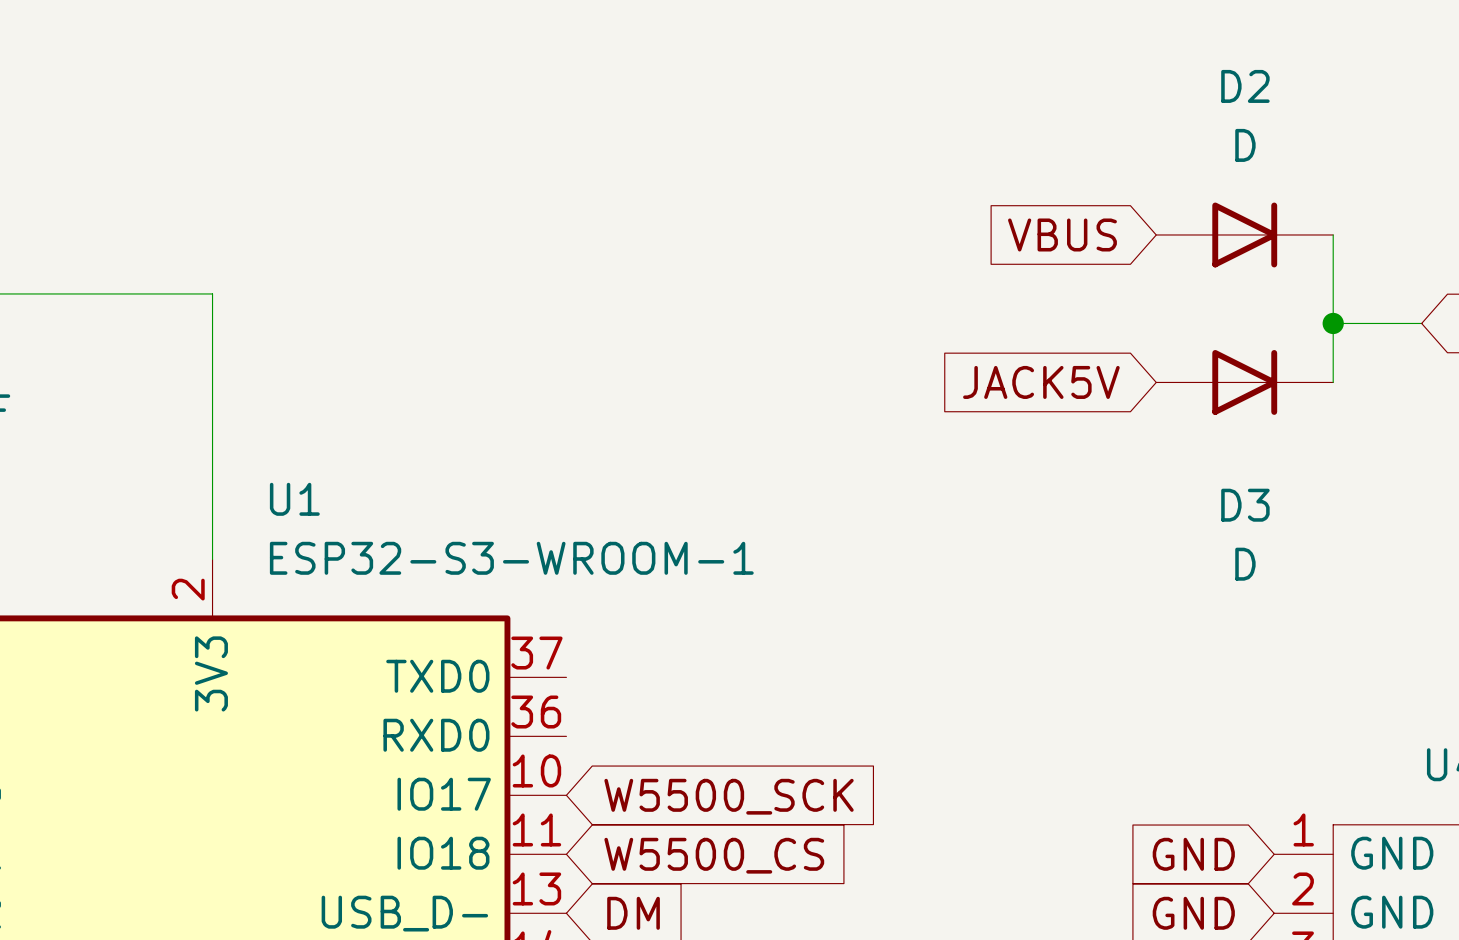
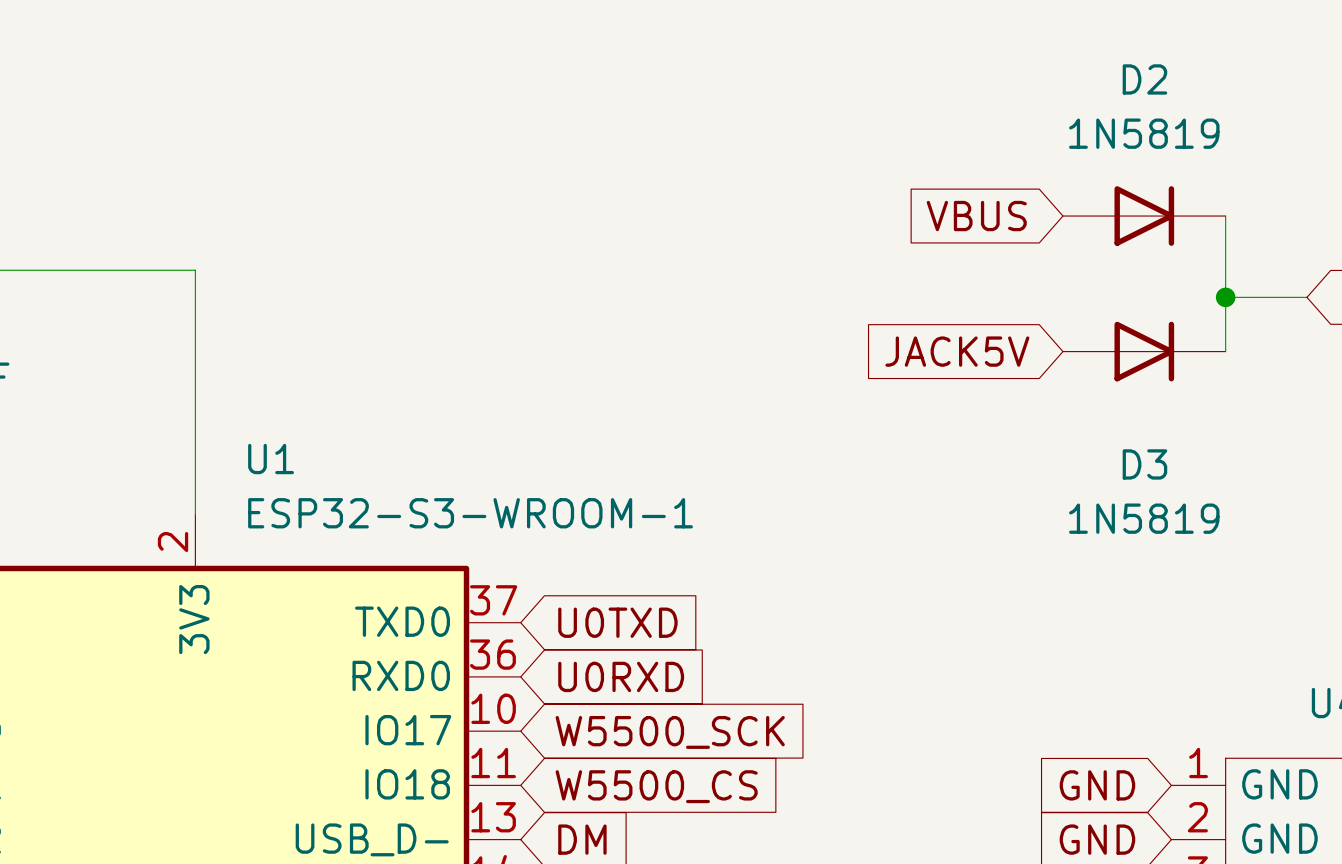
D2 value: D (1245, 145) -> 1N5819 (1144, 133)
D3 value: D (1245, 564) -> 1N5819 (1144, 518)
global label: none -> U0TXD (617, 622)
global label: none -> U0RXD (621, 676)

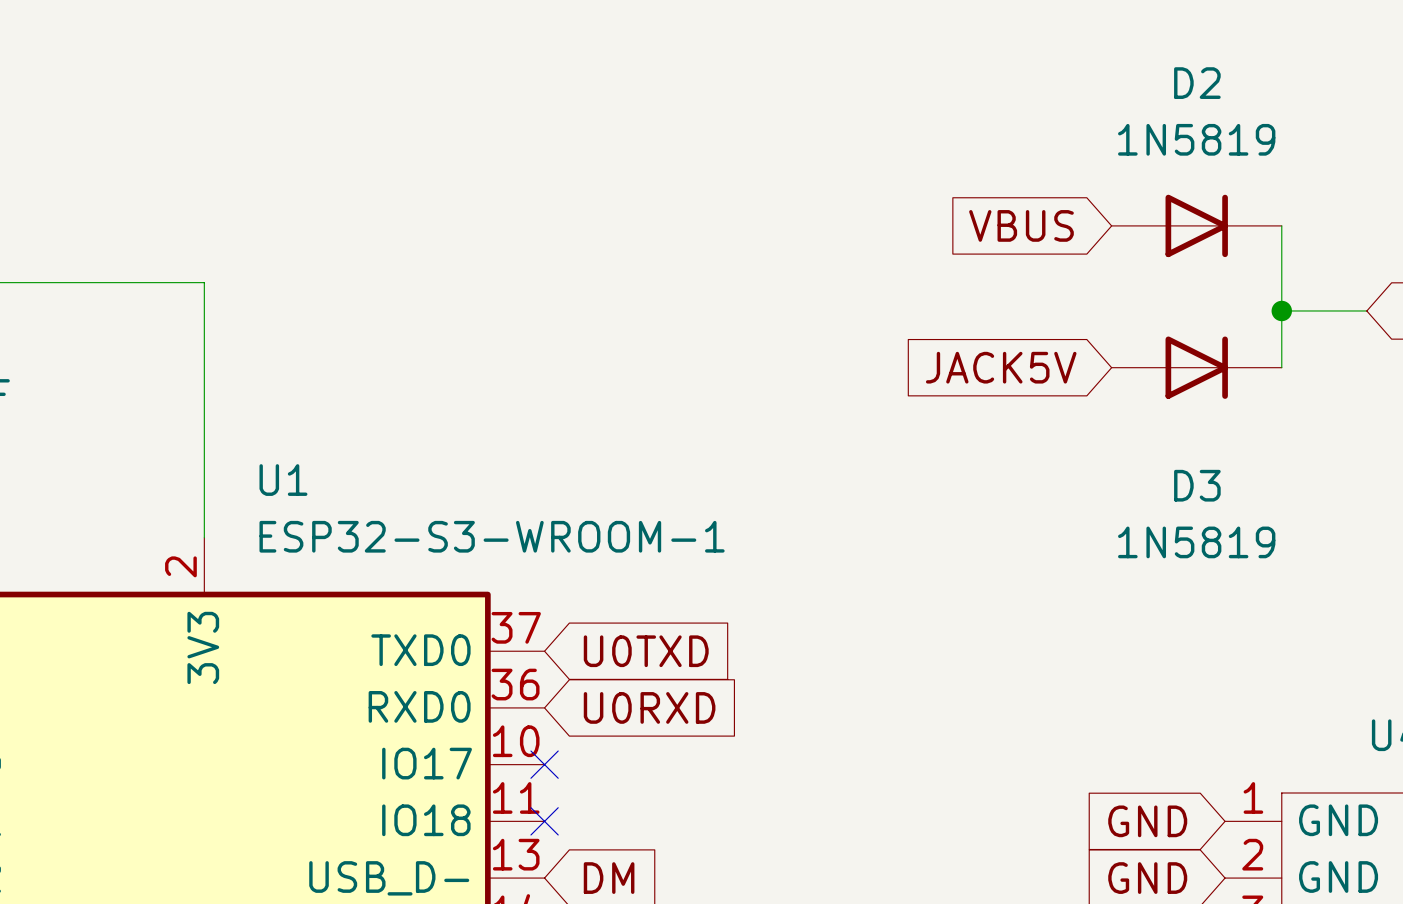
no-connect mark: none -> (544, 764)
global label: W5500_SCK (670, 732) -> none
no-connect mark: none -> (544, 821)
global label: W5500_CS (656, 786) -> none

